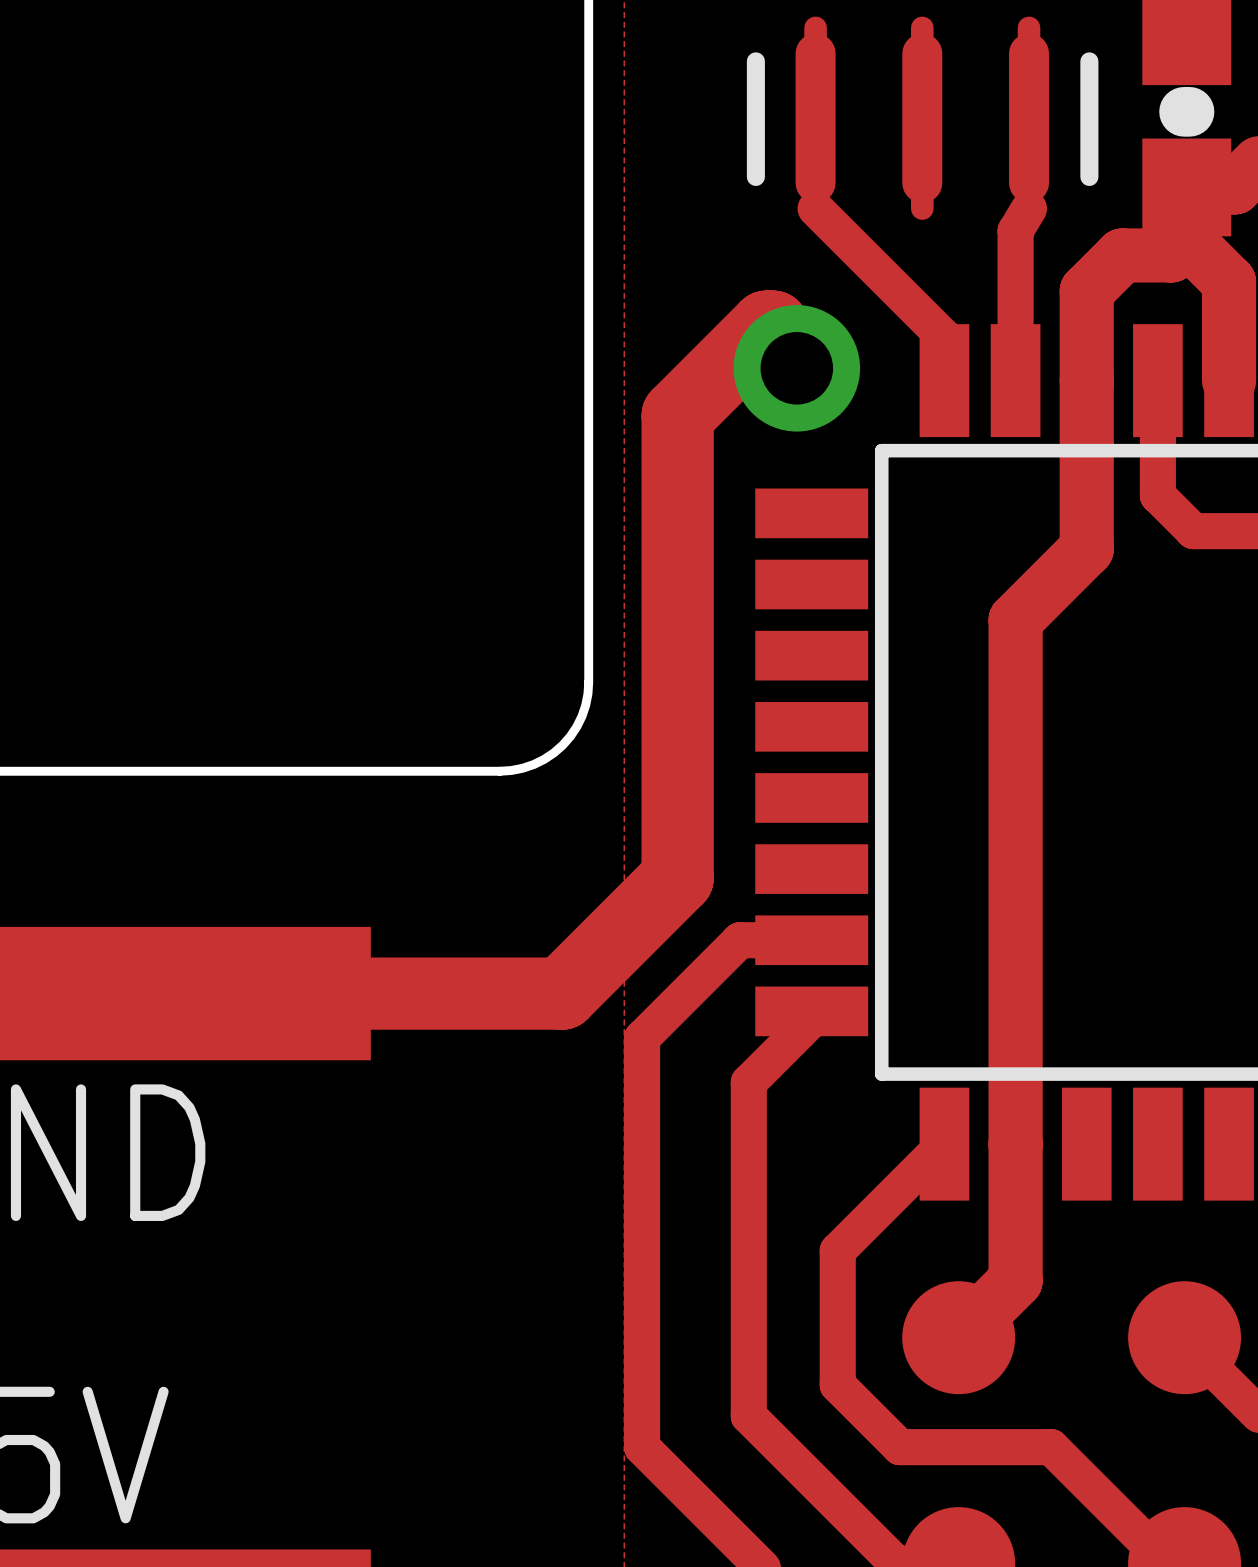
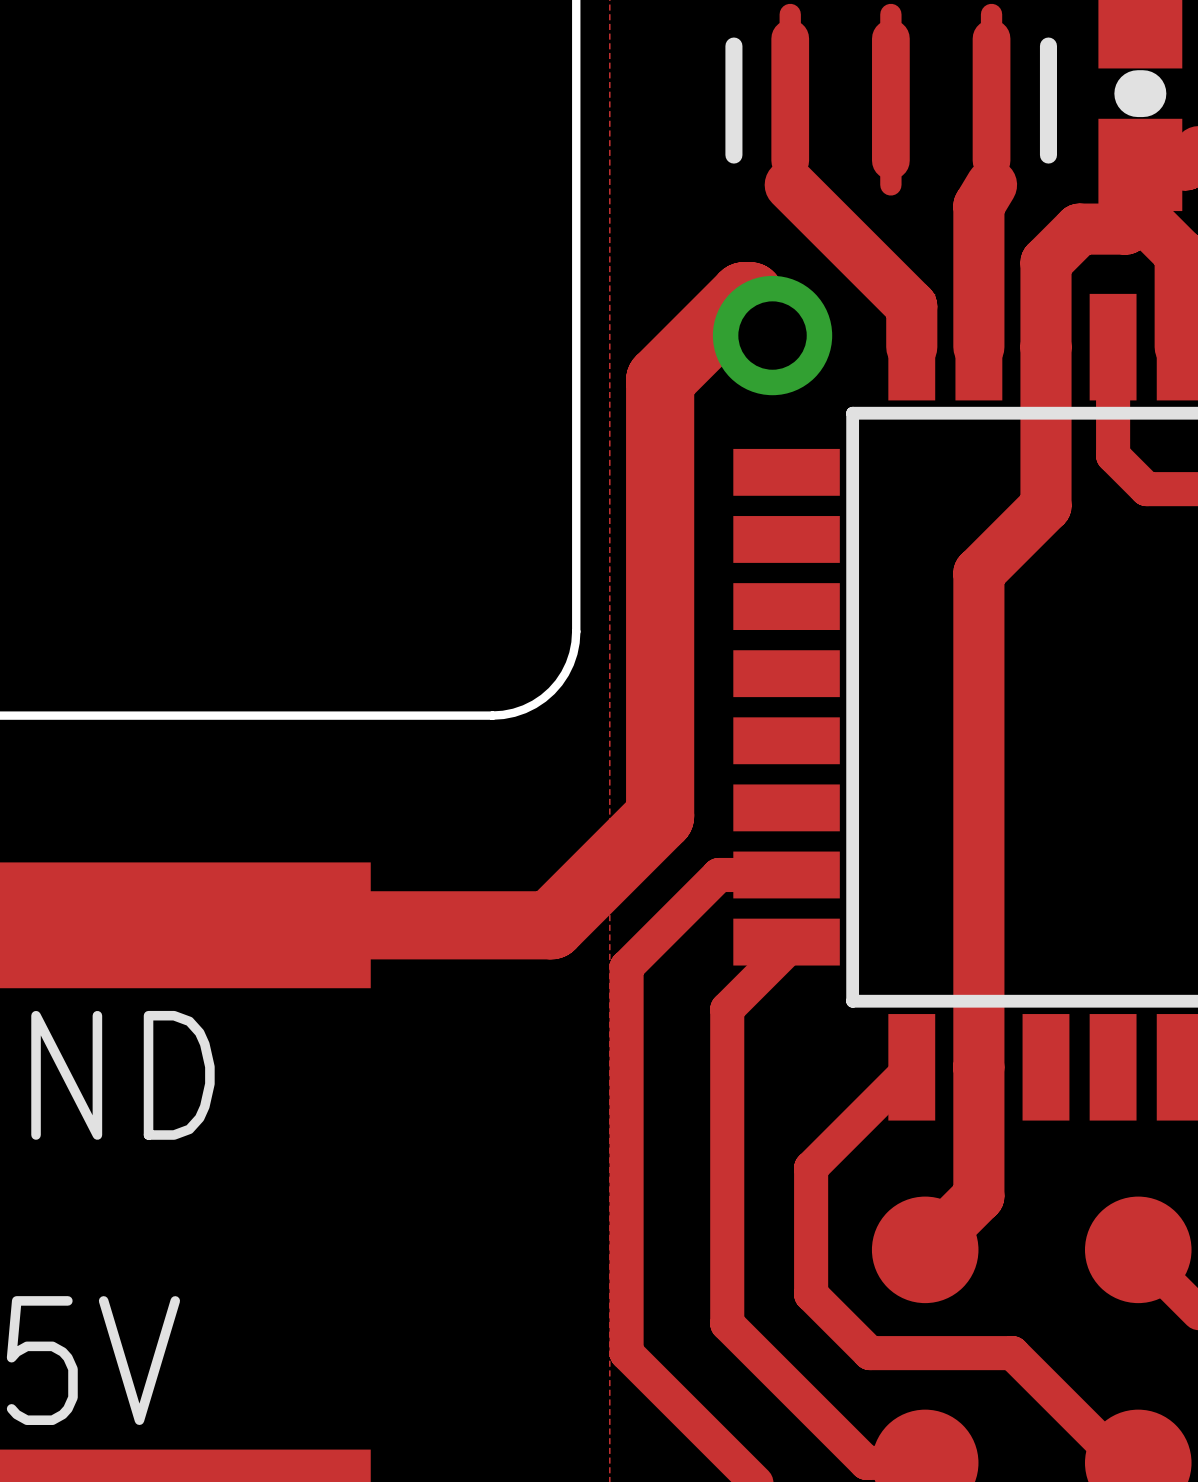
track width: thin (815, 208) (944, 337) (944, 380) -> thick (790, 184) (911, 306) (911, 347)
track width: thin (1029, 208) (1015, 230) (1015, 380) -> thick (991, 184) (978, 205) (978, 347)

